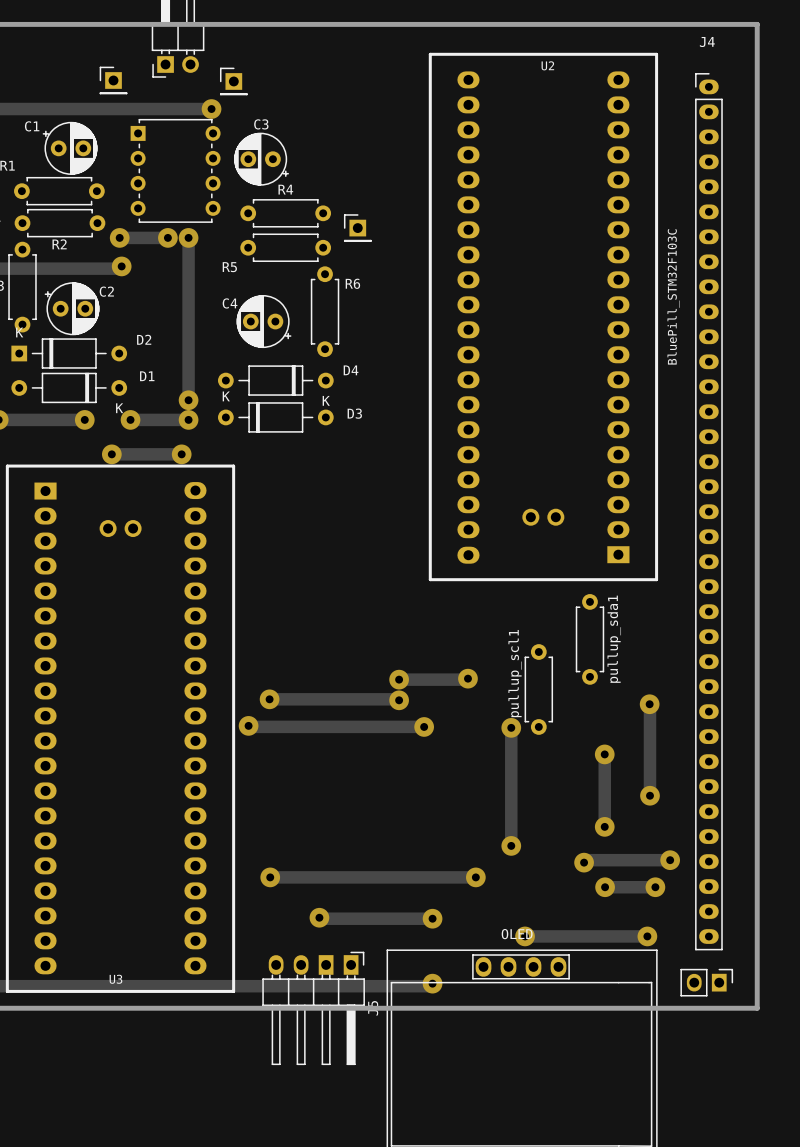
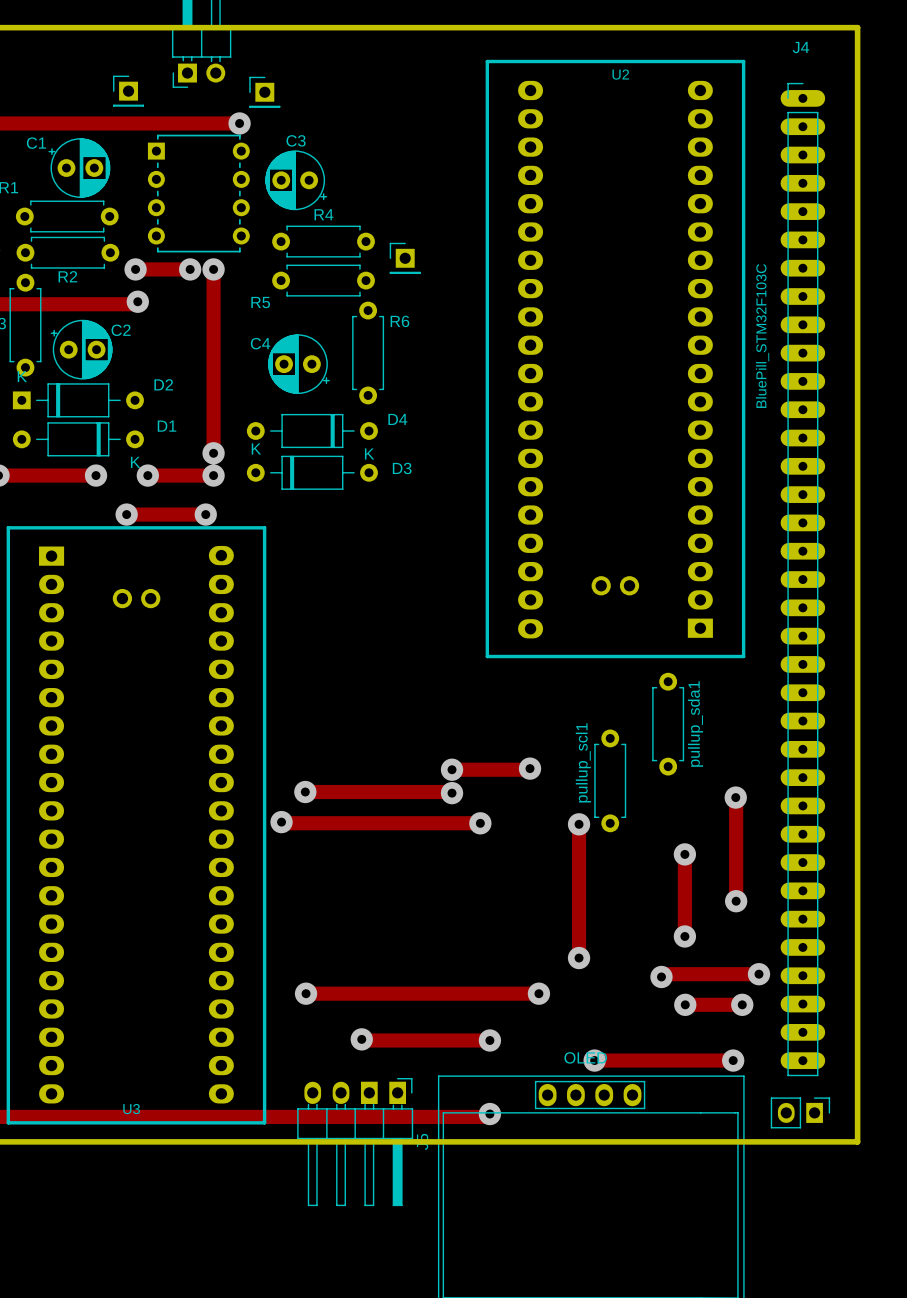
J4 footprint: [695, 73, 723, 951] -> [780, 82, 826, 1077]

